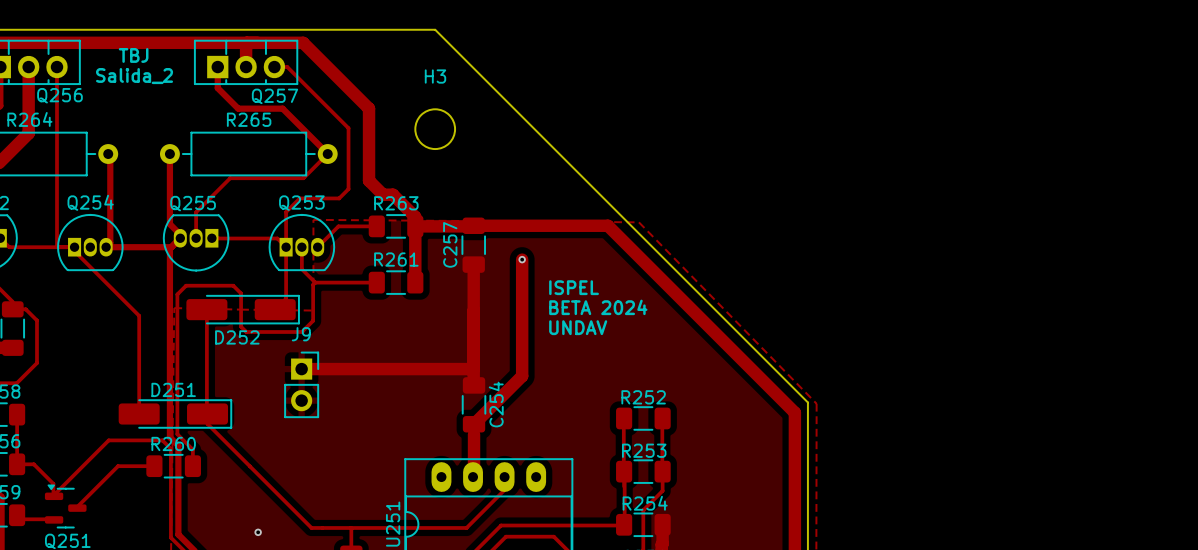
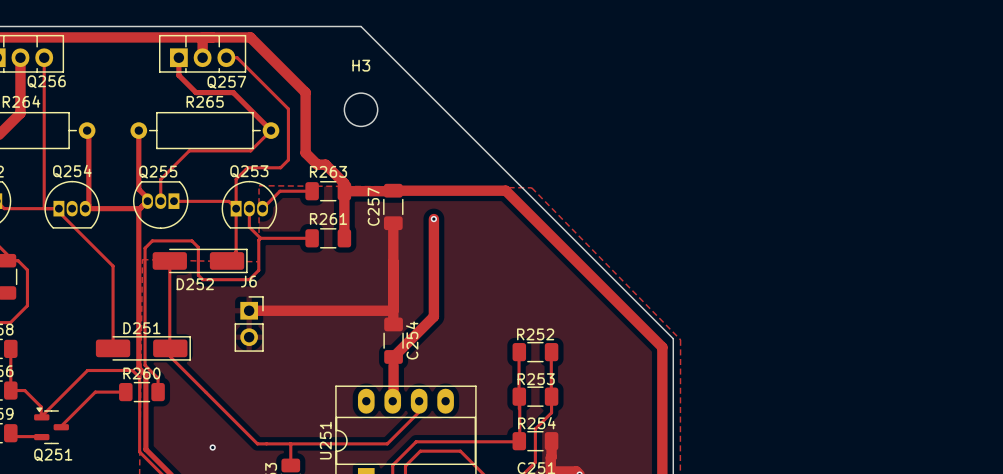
text: TBJ (133, 55) -> none
text: Salida_2 (134, 76) -> none
text: ISPEL (574, 287) -> none
text: BETA 2024 (598, 307) -> none
text: UNDAV (578, 327) -> none
J9 name: J9 (301, 334) -> J6 (248, 281)

